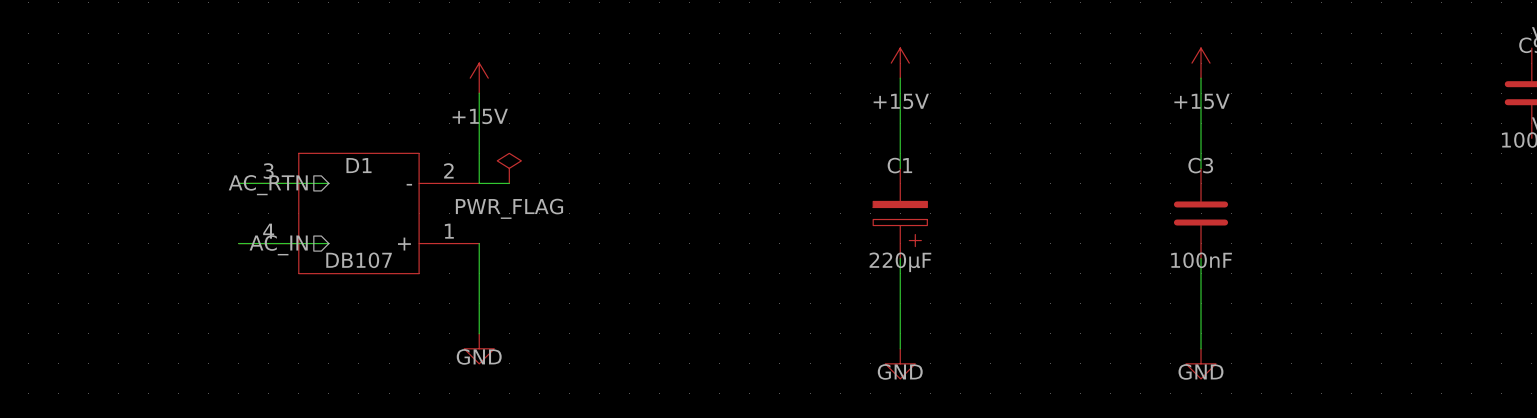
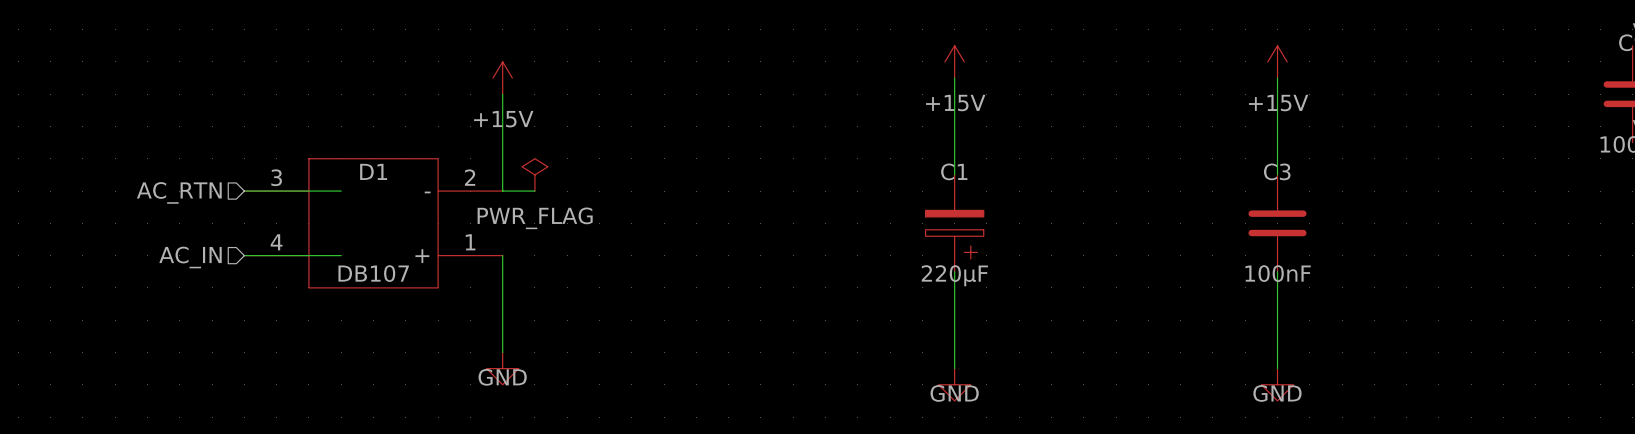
hierarchical label position: AC_RTN (268, 185) -> AC_RTN (179, 192)
hierarchical label position: AC_IN (278, 245) -> AC_IN (190, 257)

